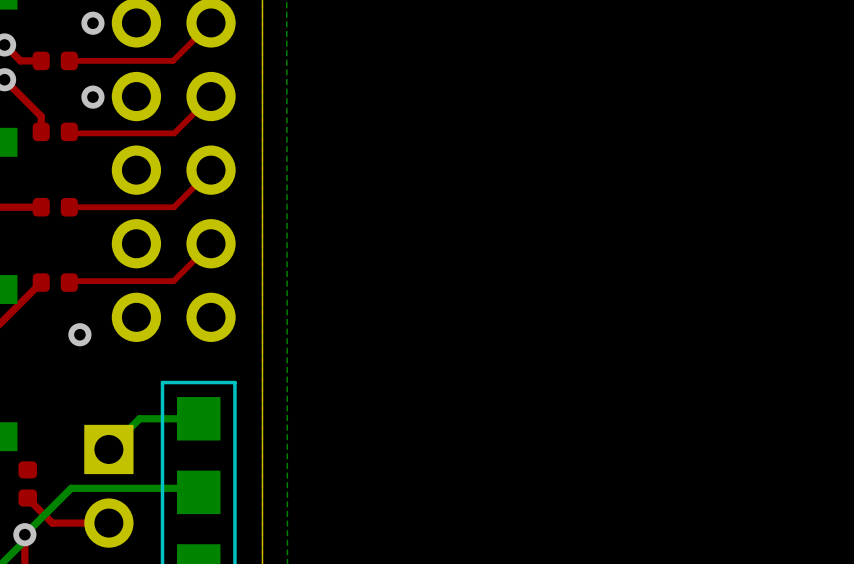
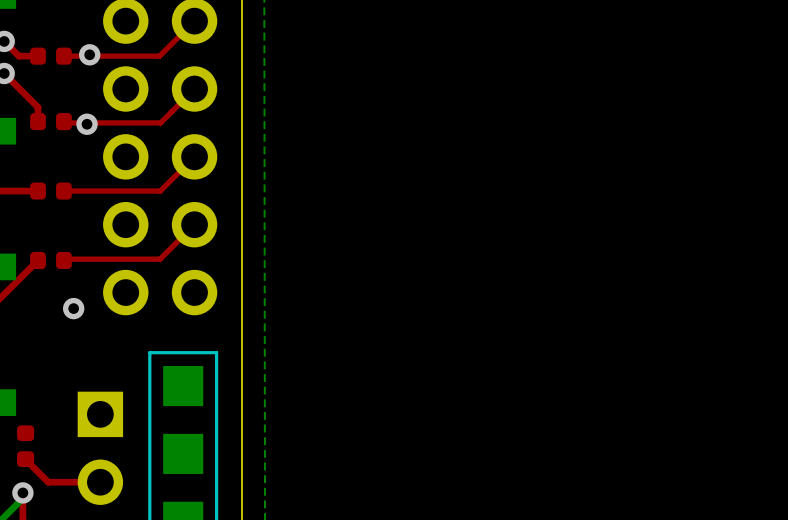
via: (92, 23) -> none
via: none -> (89, 54)
via: (92, 97) -> none
via: none -> (87, 124)
bottom track: (198, 418) (139, 418) (109, 449) -> none
bottom track: (198, 492) (194, 488) (71, 488) (24, 534) -> none

